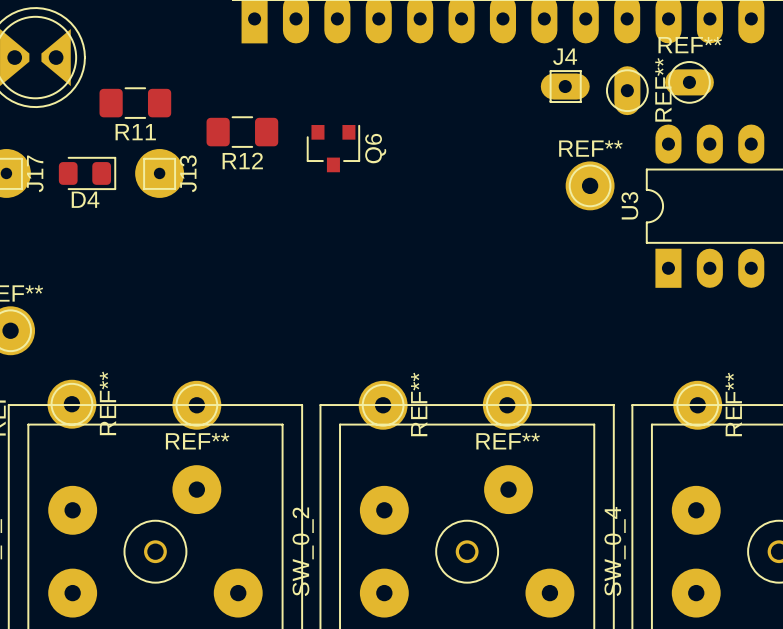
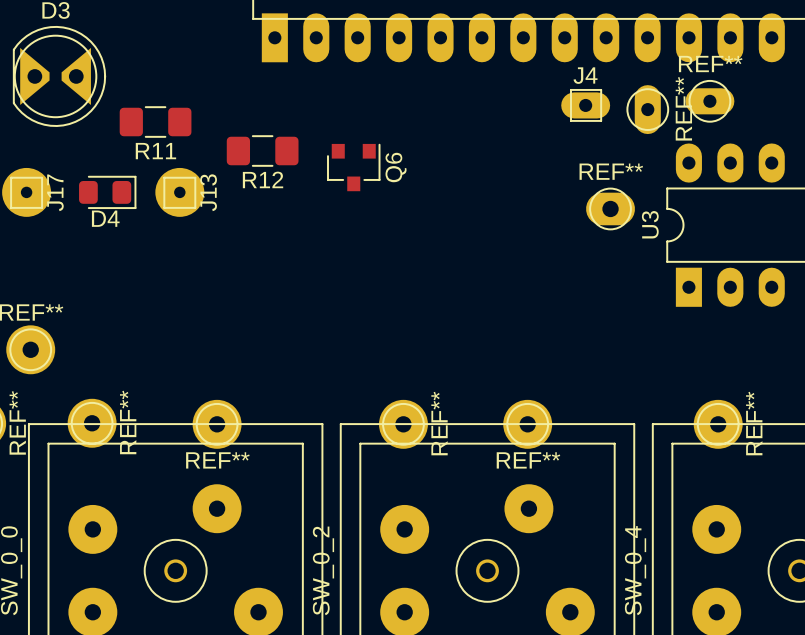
REF** footprint: [565, 161, 615, 211] -> [586, 187, 635, 231]

